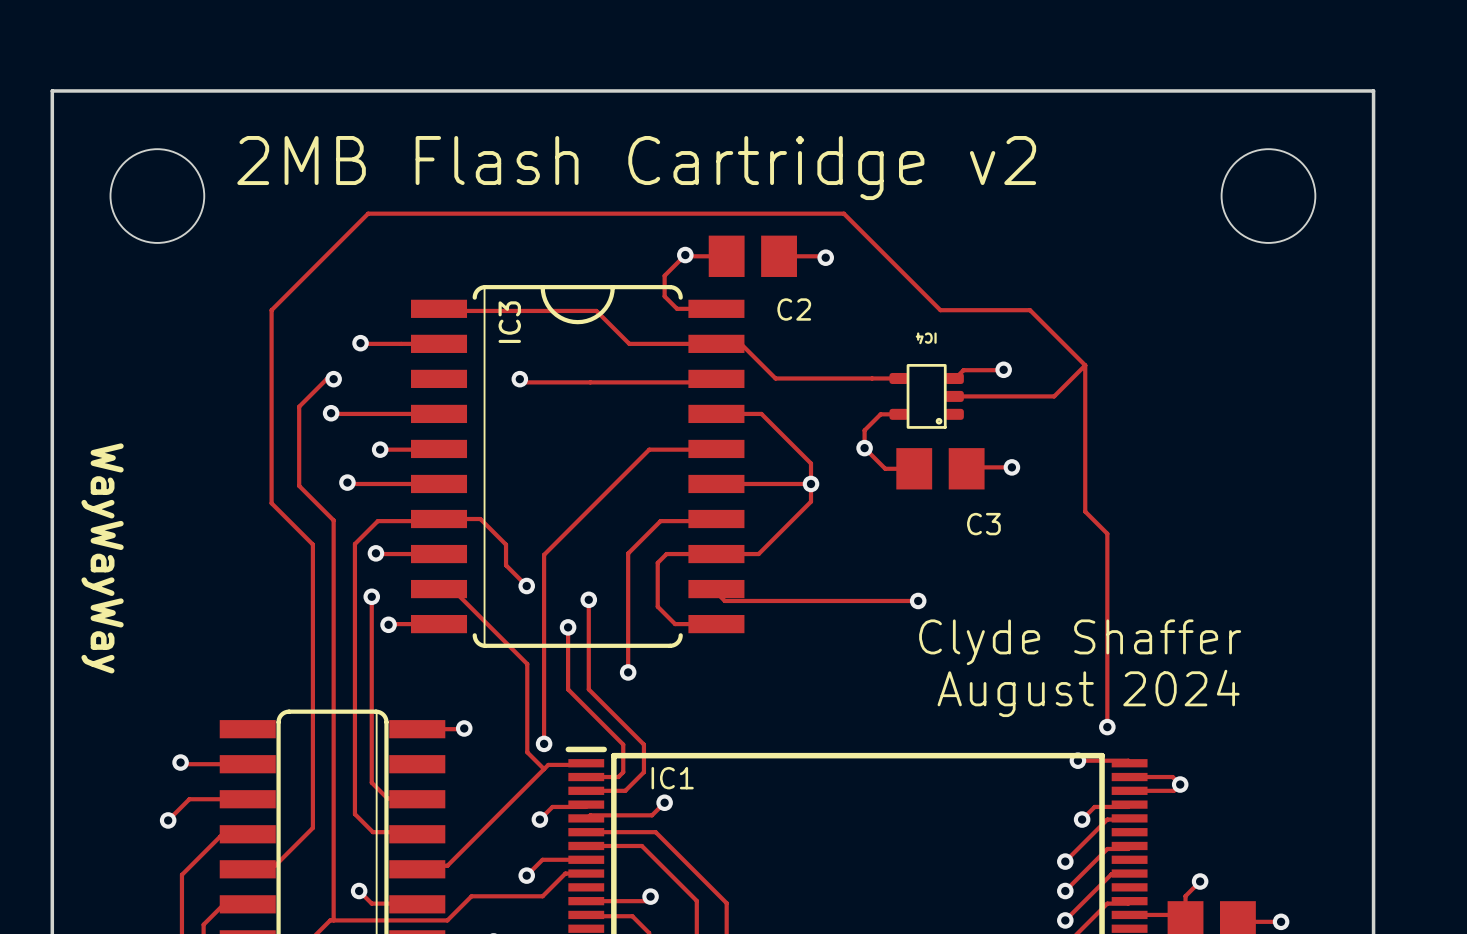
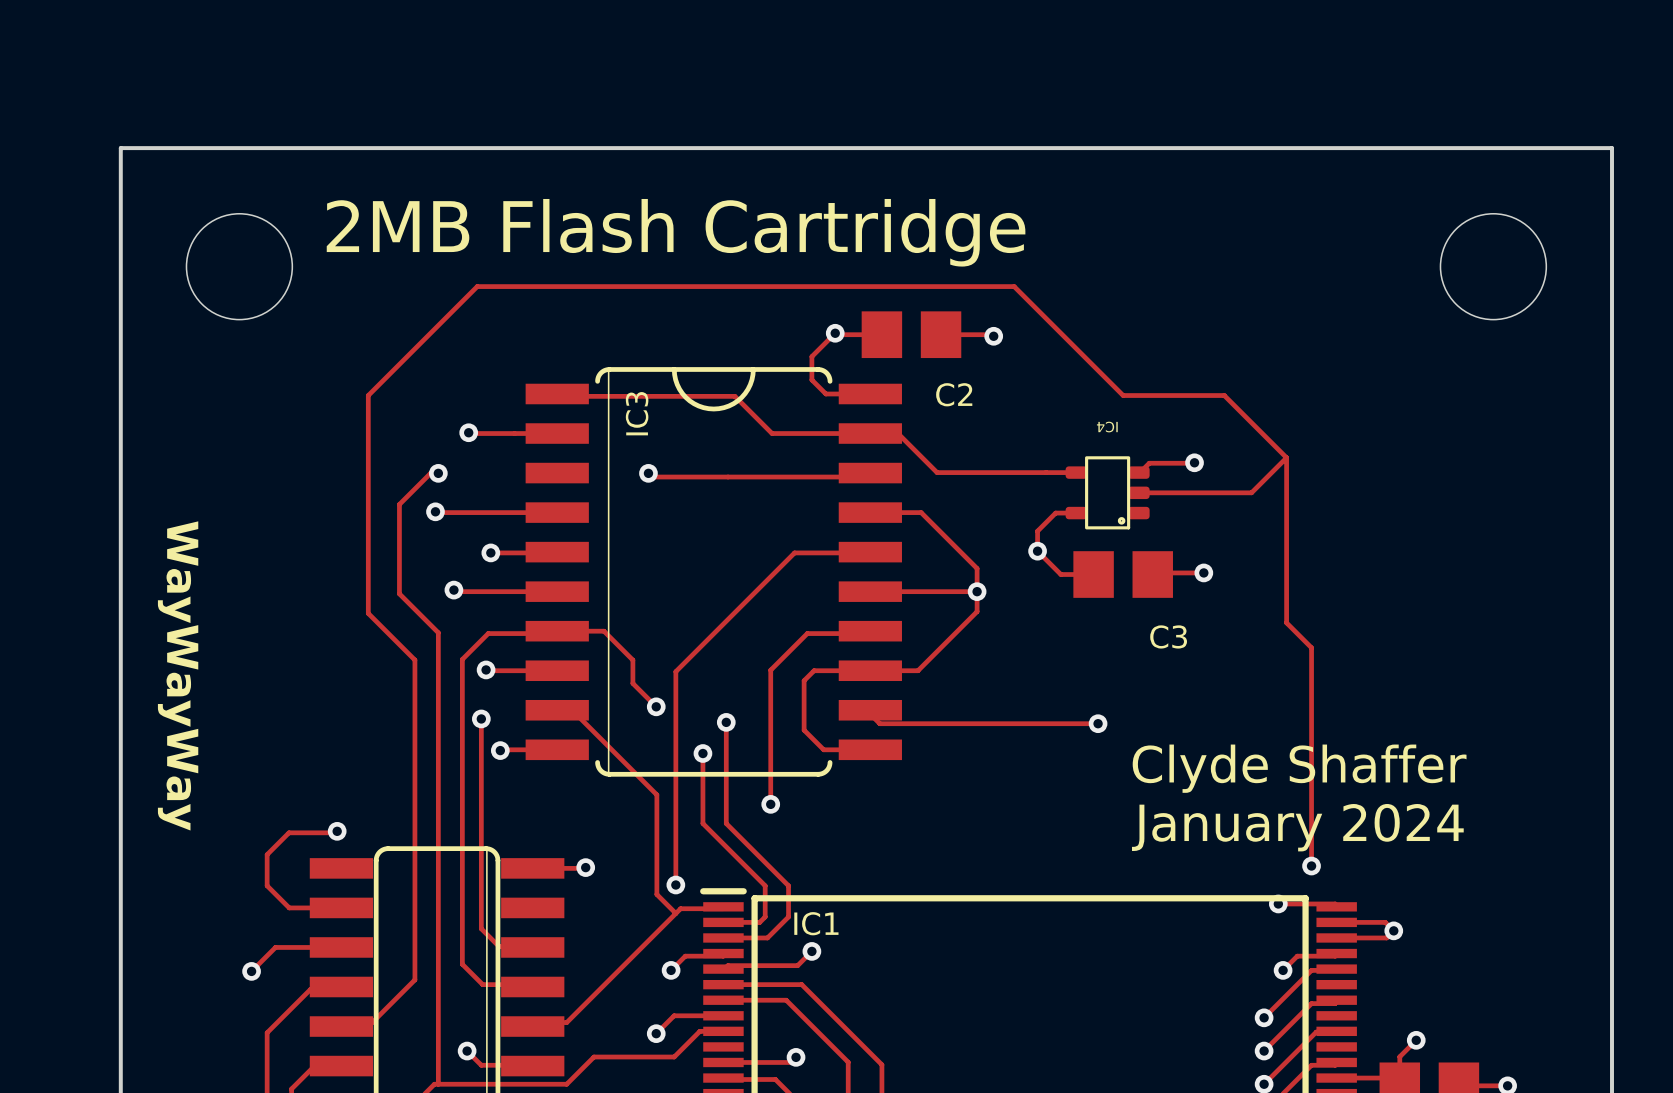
text: 2MB Flash Cartridge v2 (636, 168) -> 2MB Flash Cartridge (676, 232)
text: August 2024 (1088, 693) -> January 2024 (1297, 827)
track: (180, 762) (182, 764) (201, 764) -> (337, 831) (289, 832) (267, 854) (267, 885) (289, 907)
via position: (180, 762) -> (337, 831)

